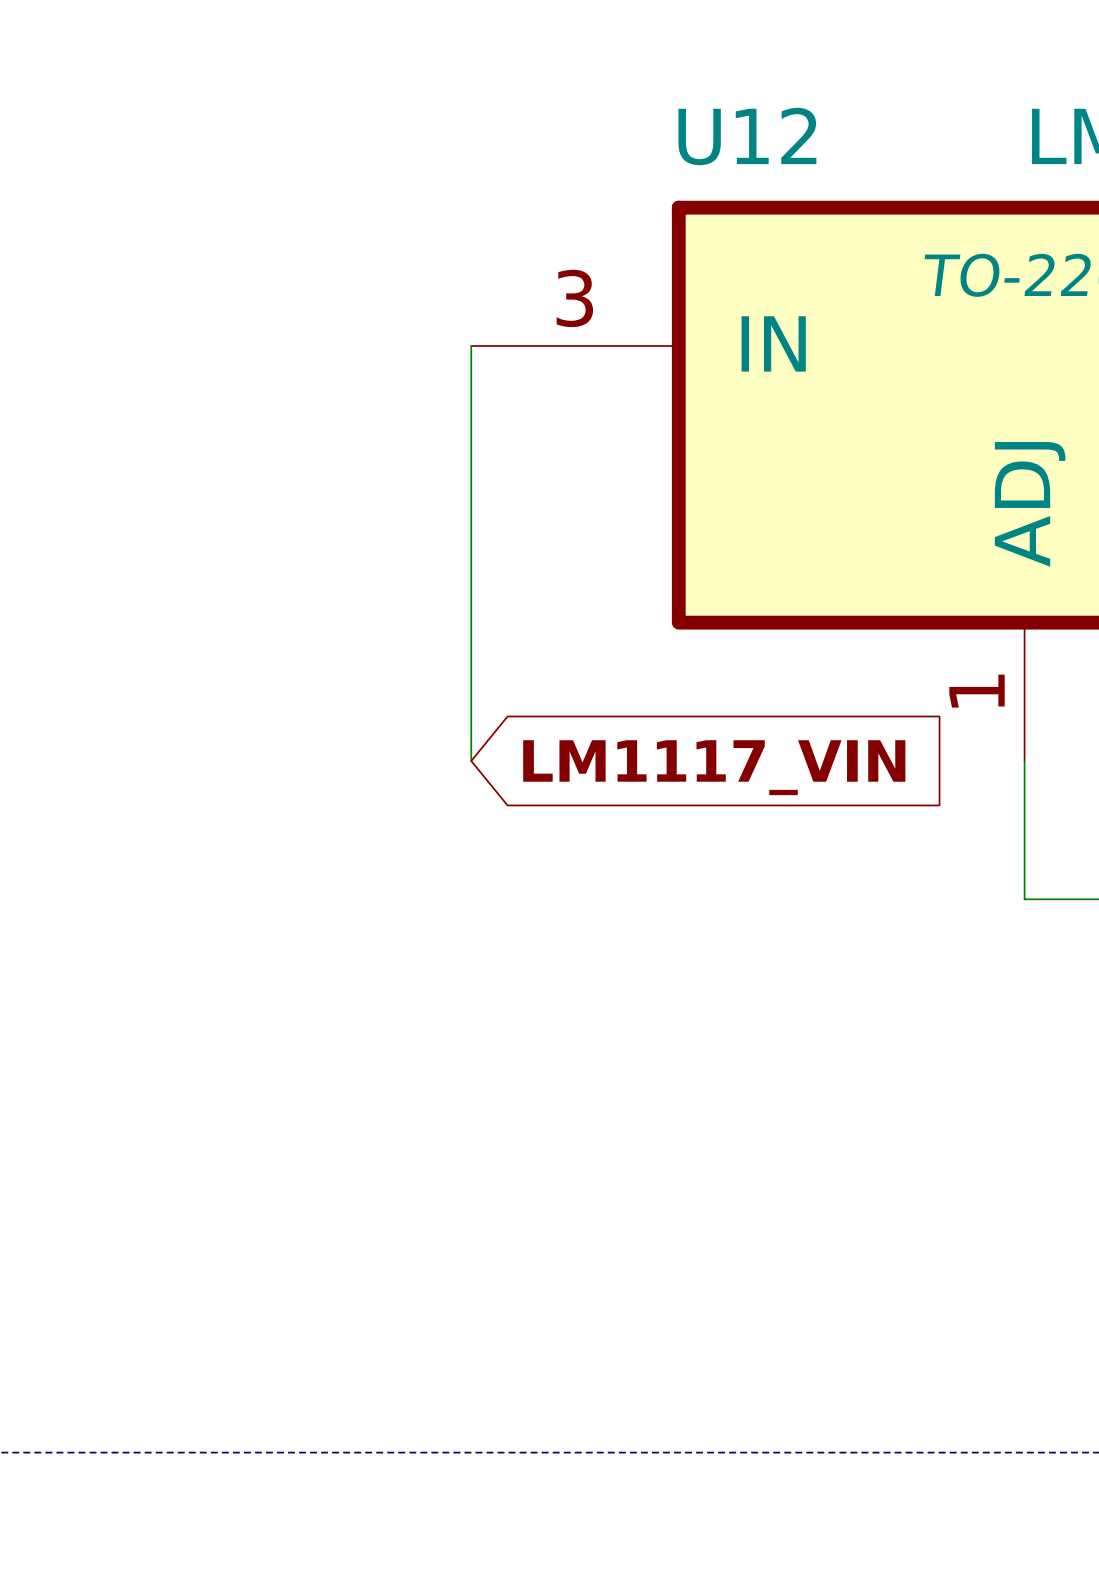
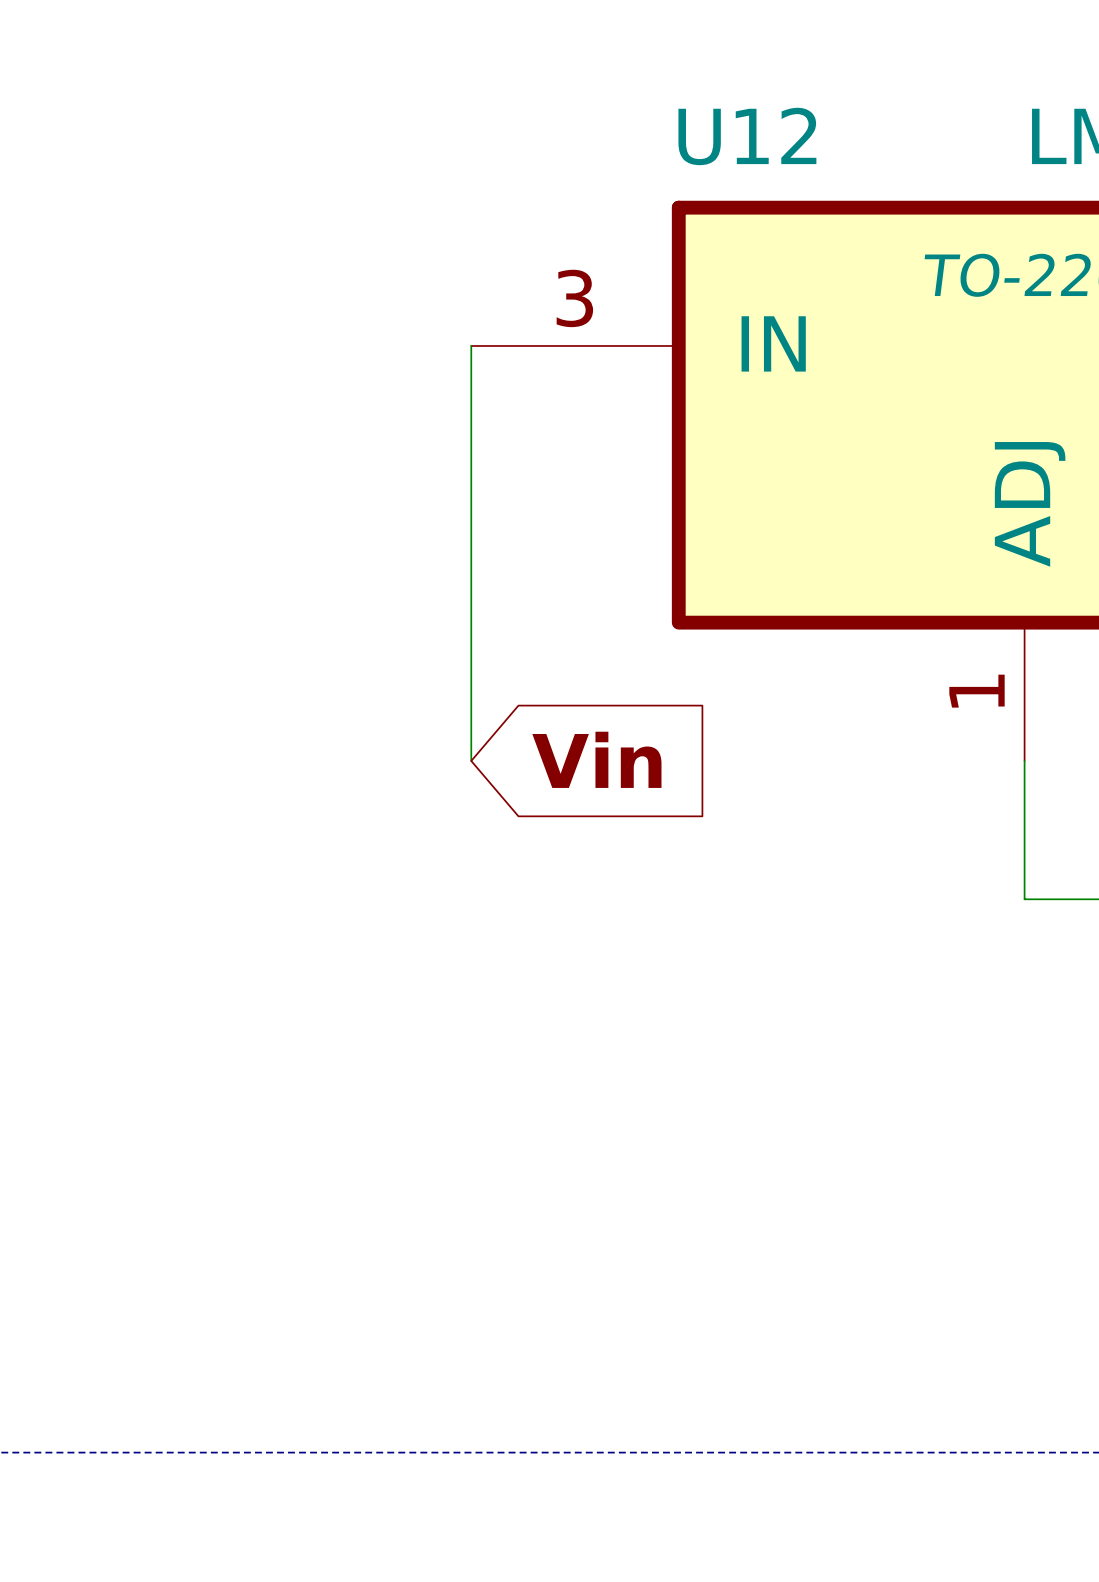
global label: LM1117_VIN (714, 767) -> Vin (596, 759)

